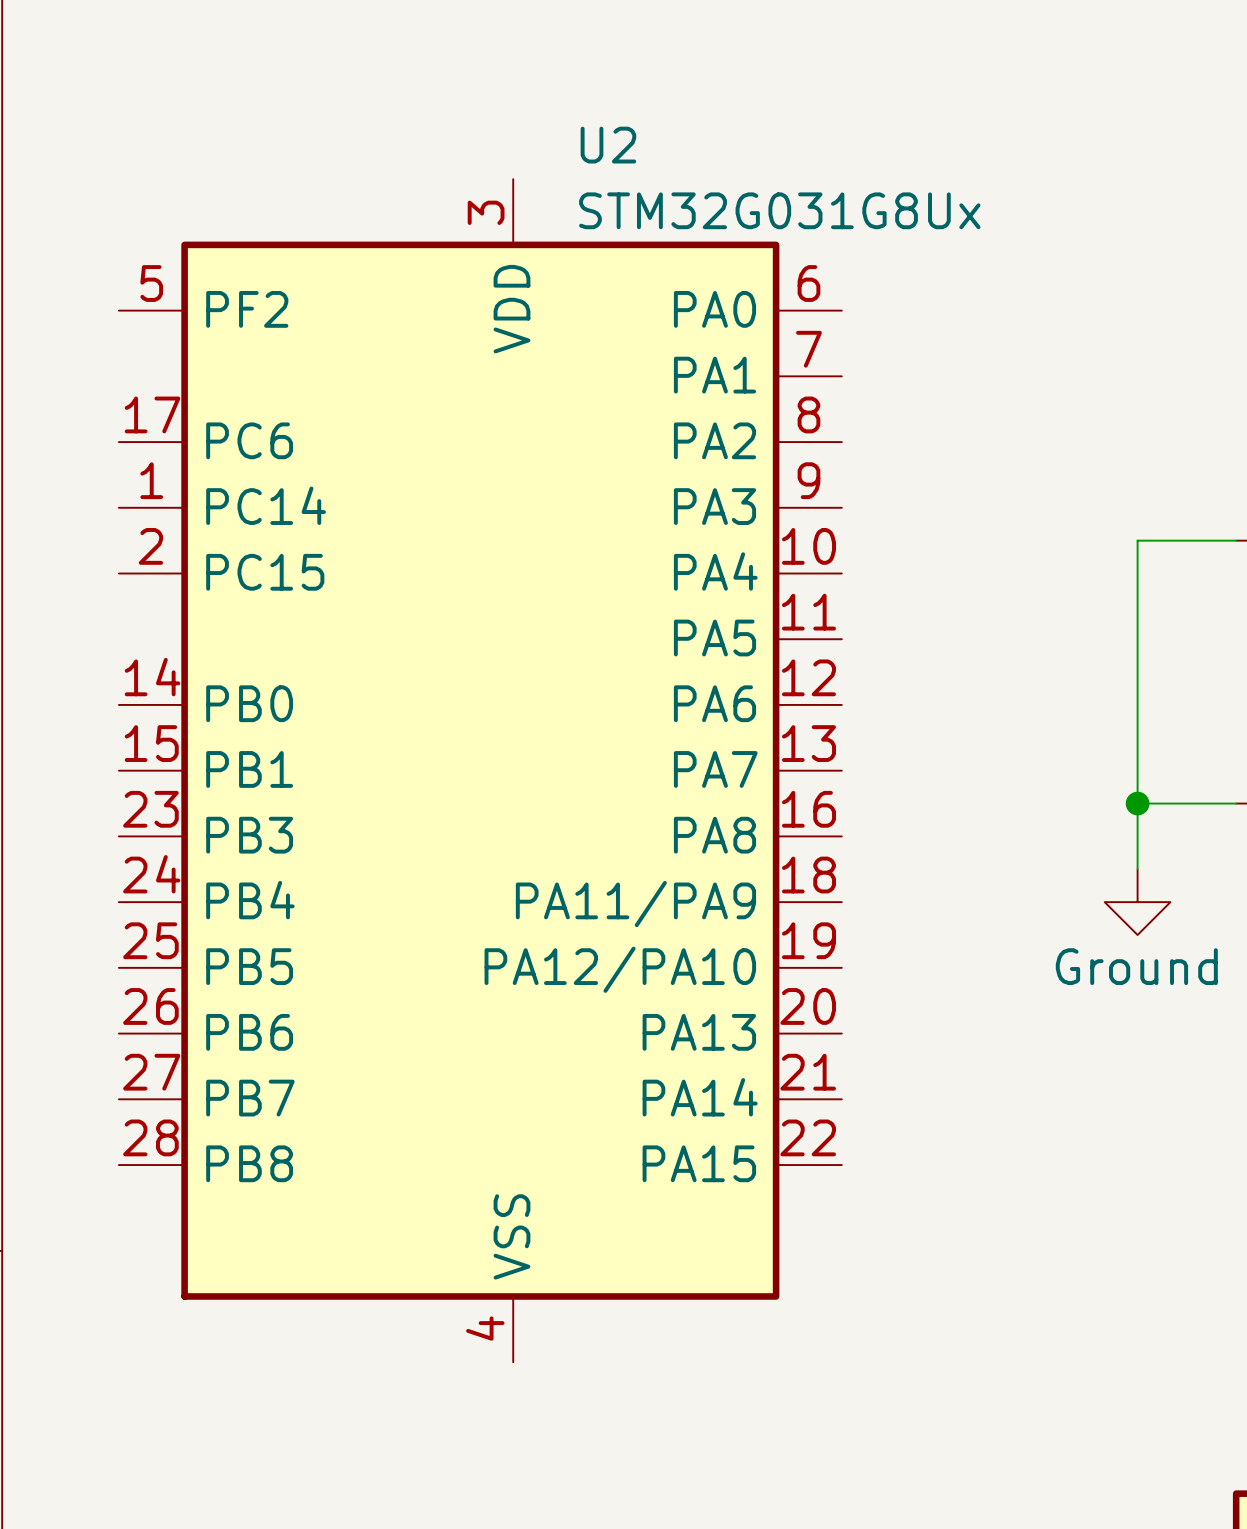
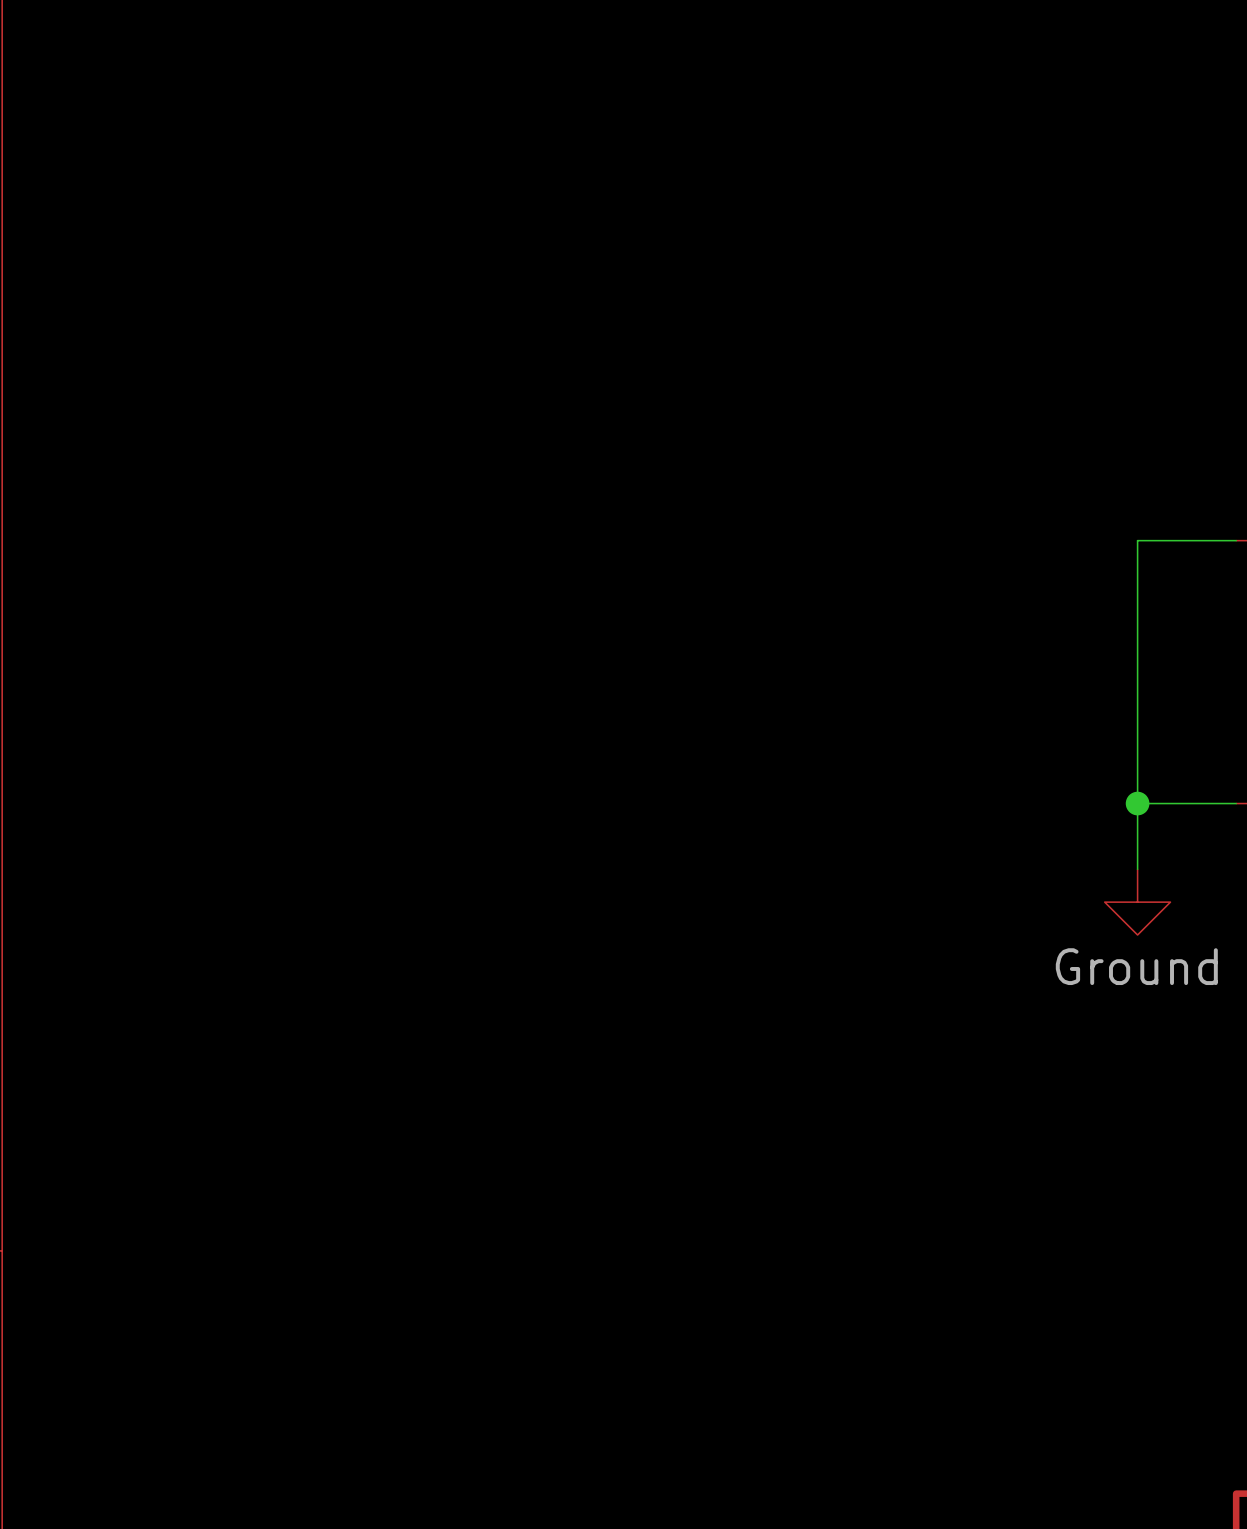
U2: STM32G031G8Ux (480, 770) -> none

